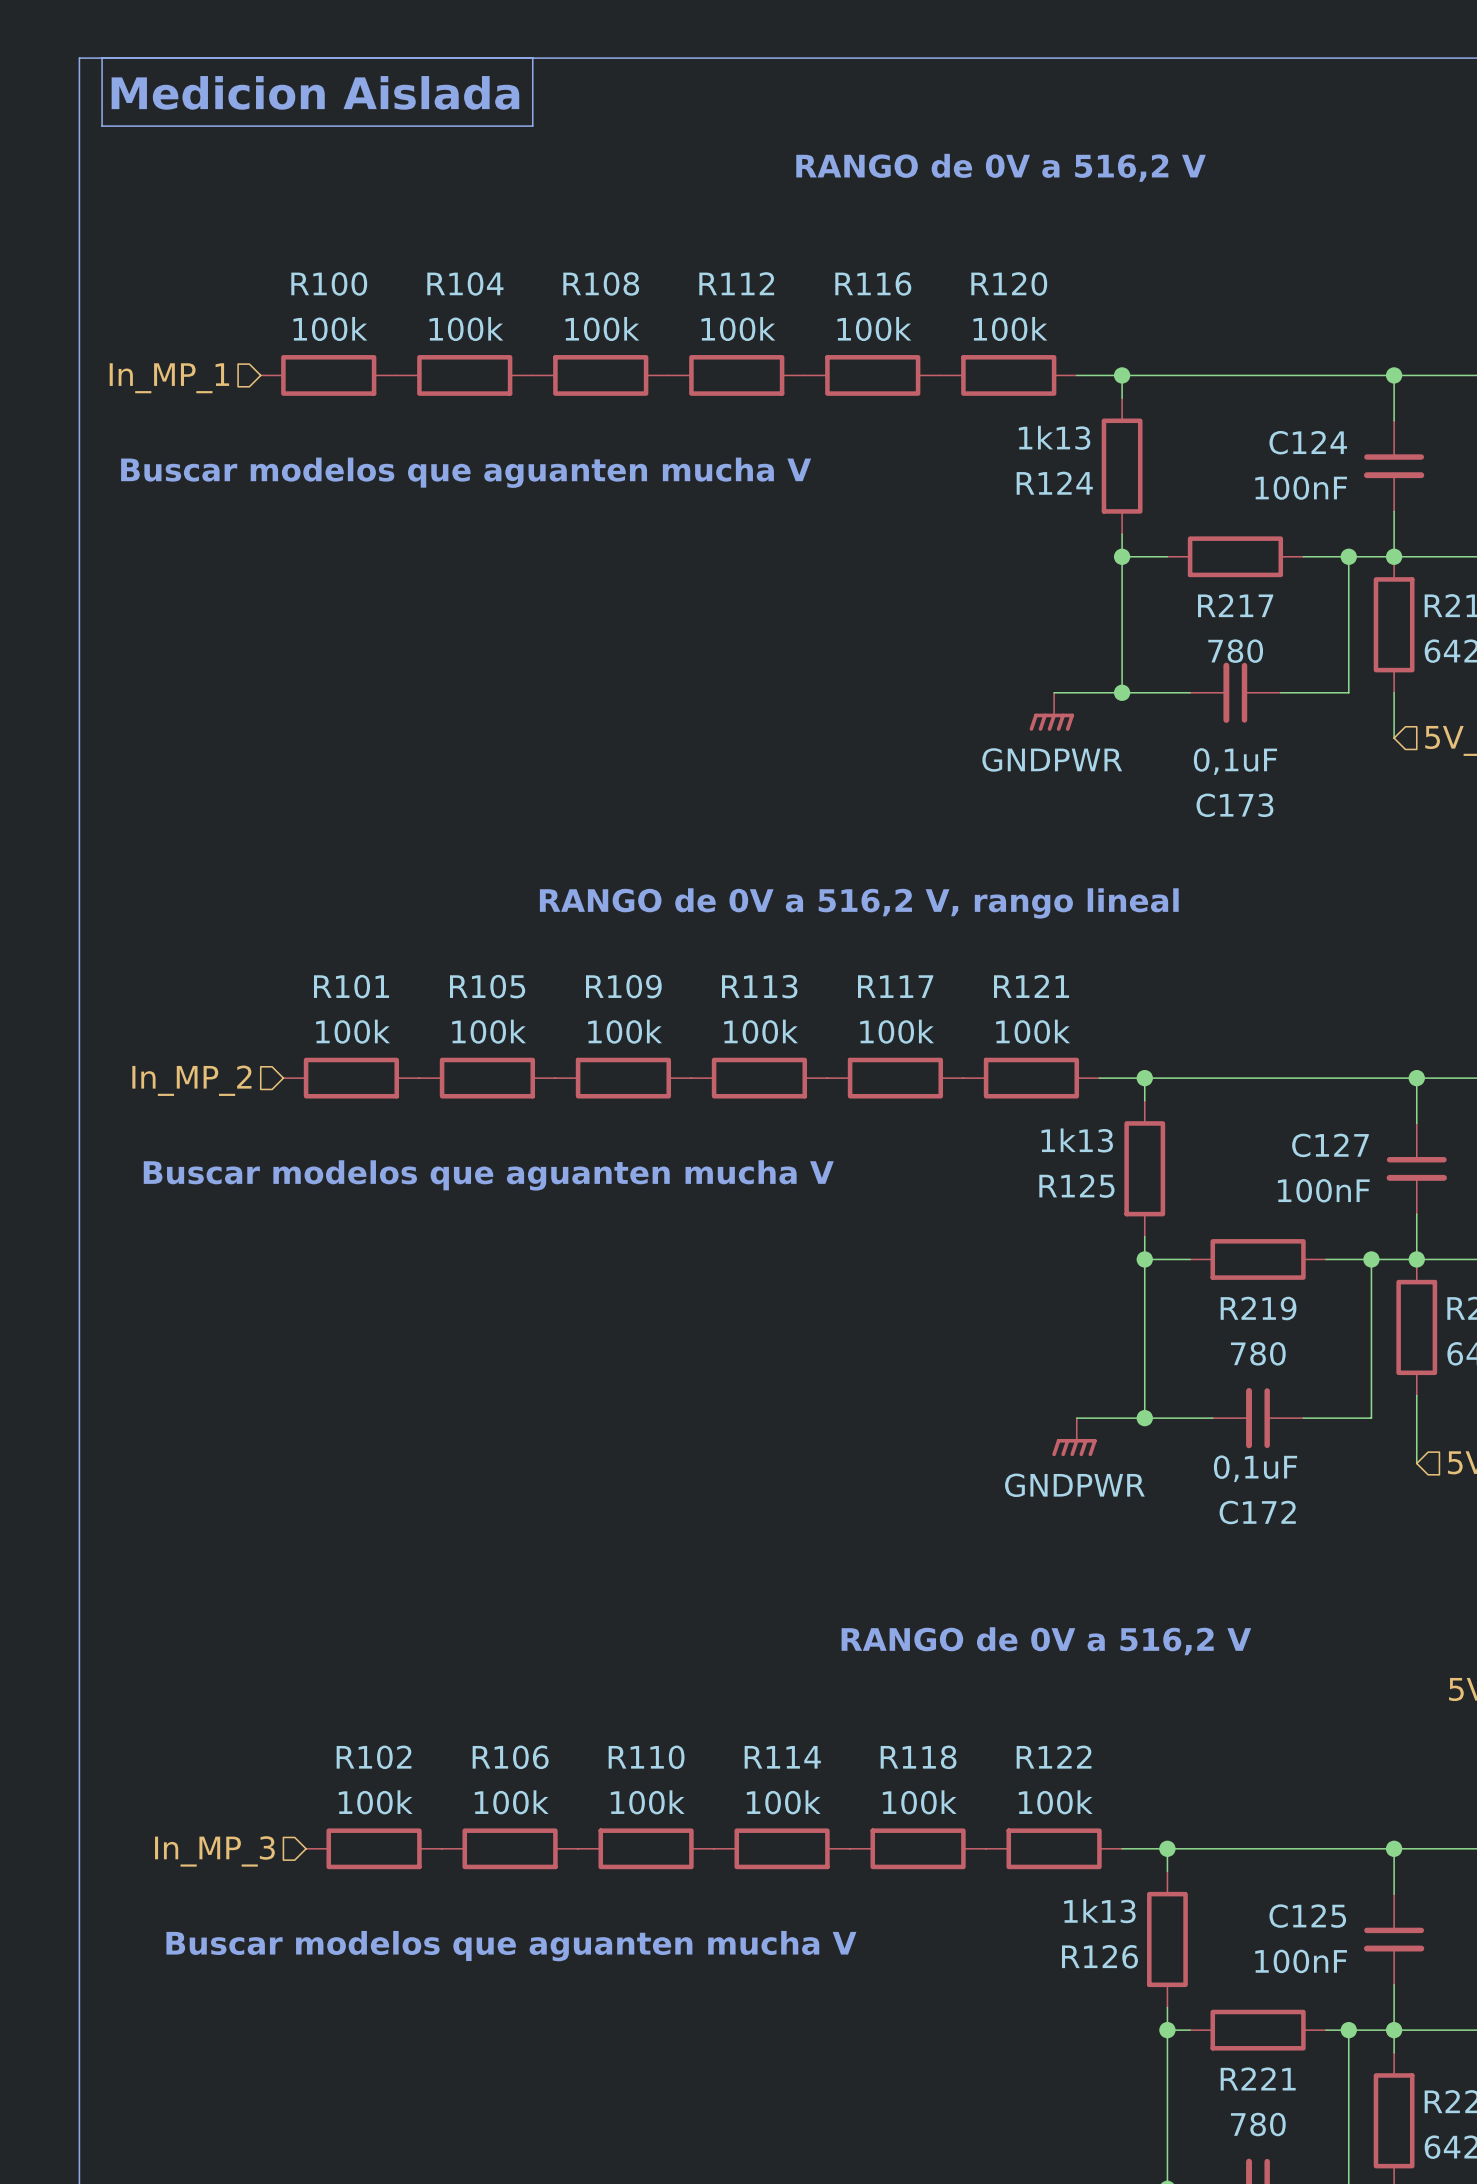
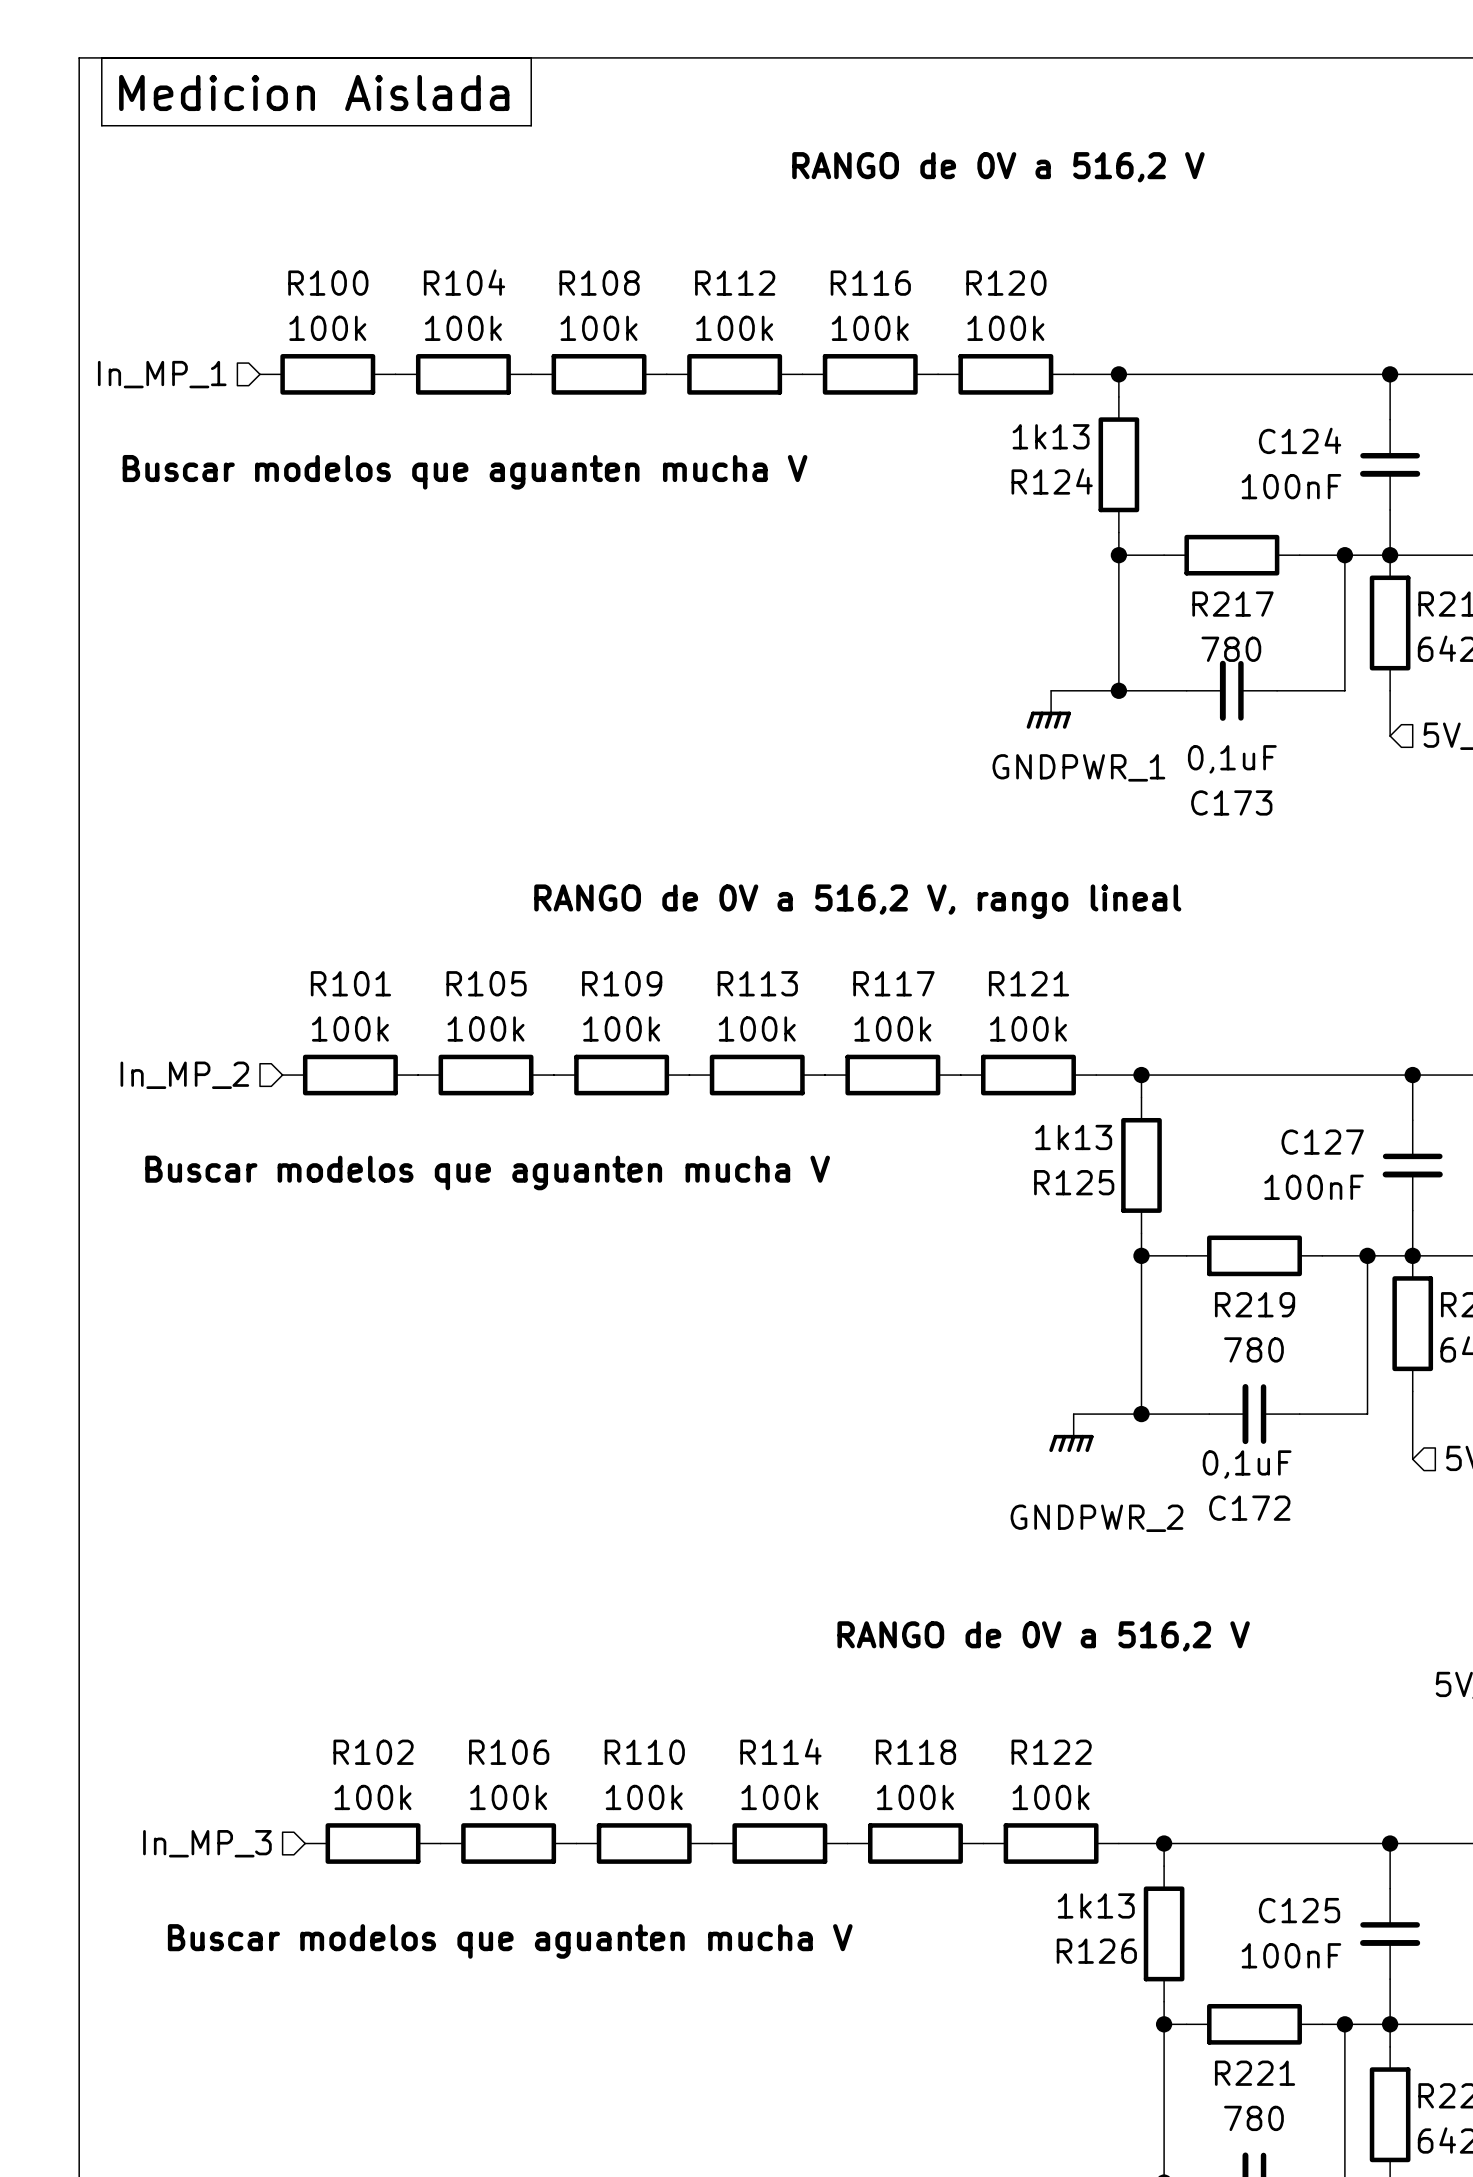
power symbol: GNDPWR (1051, 711) -> GNDPWR_1 (1048, 709)
power symbol: GNDPWR (1074, 1437) -> GNDPWR_2 (1071, 1433)

